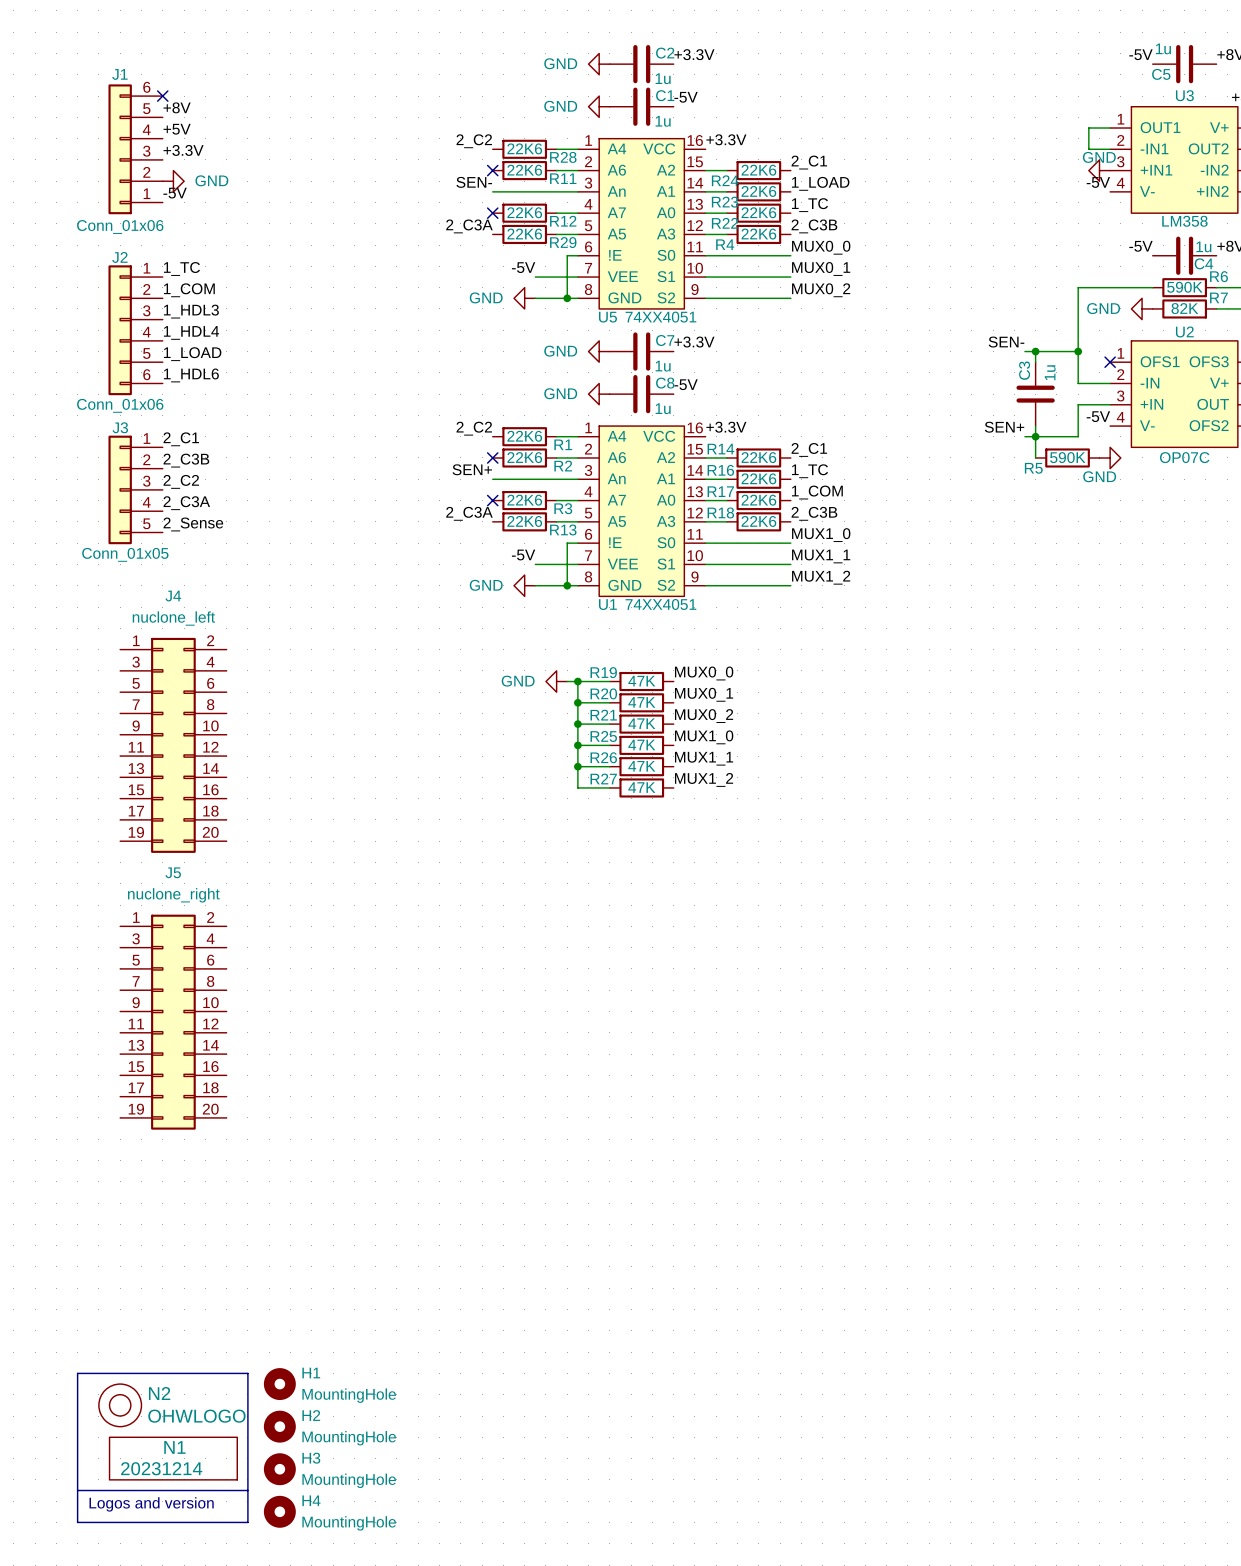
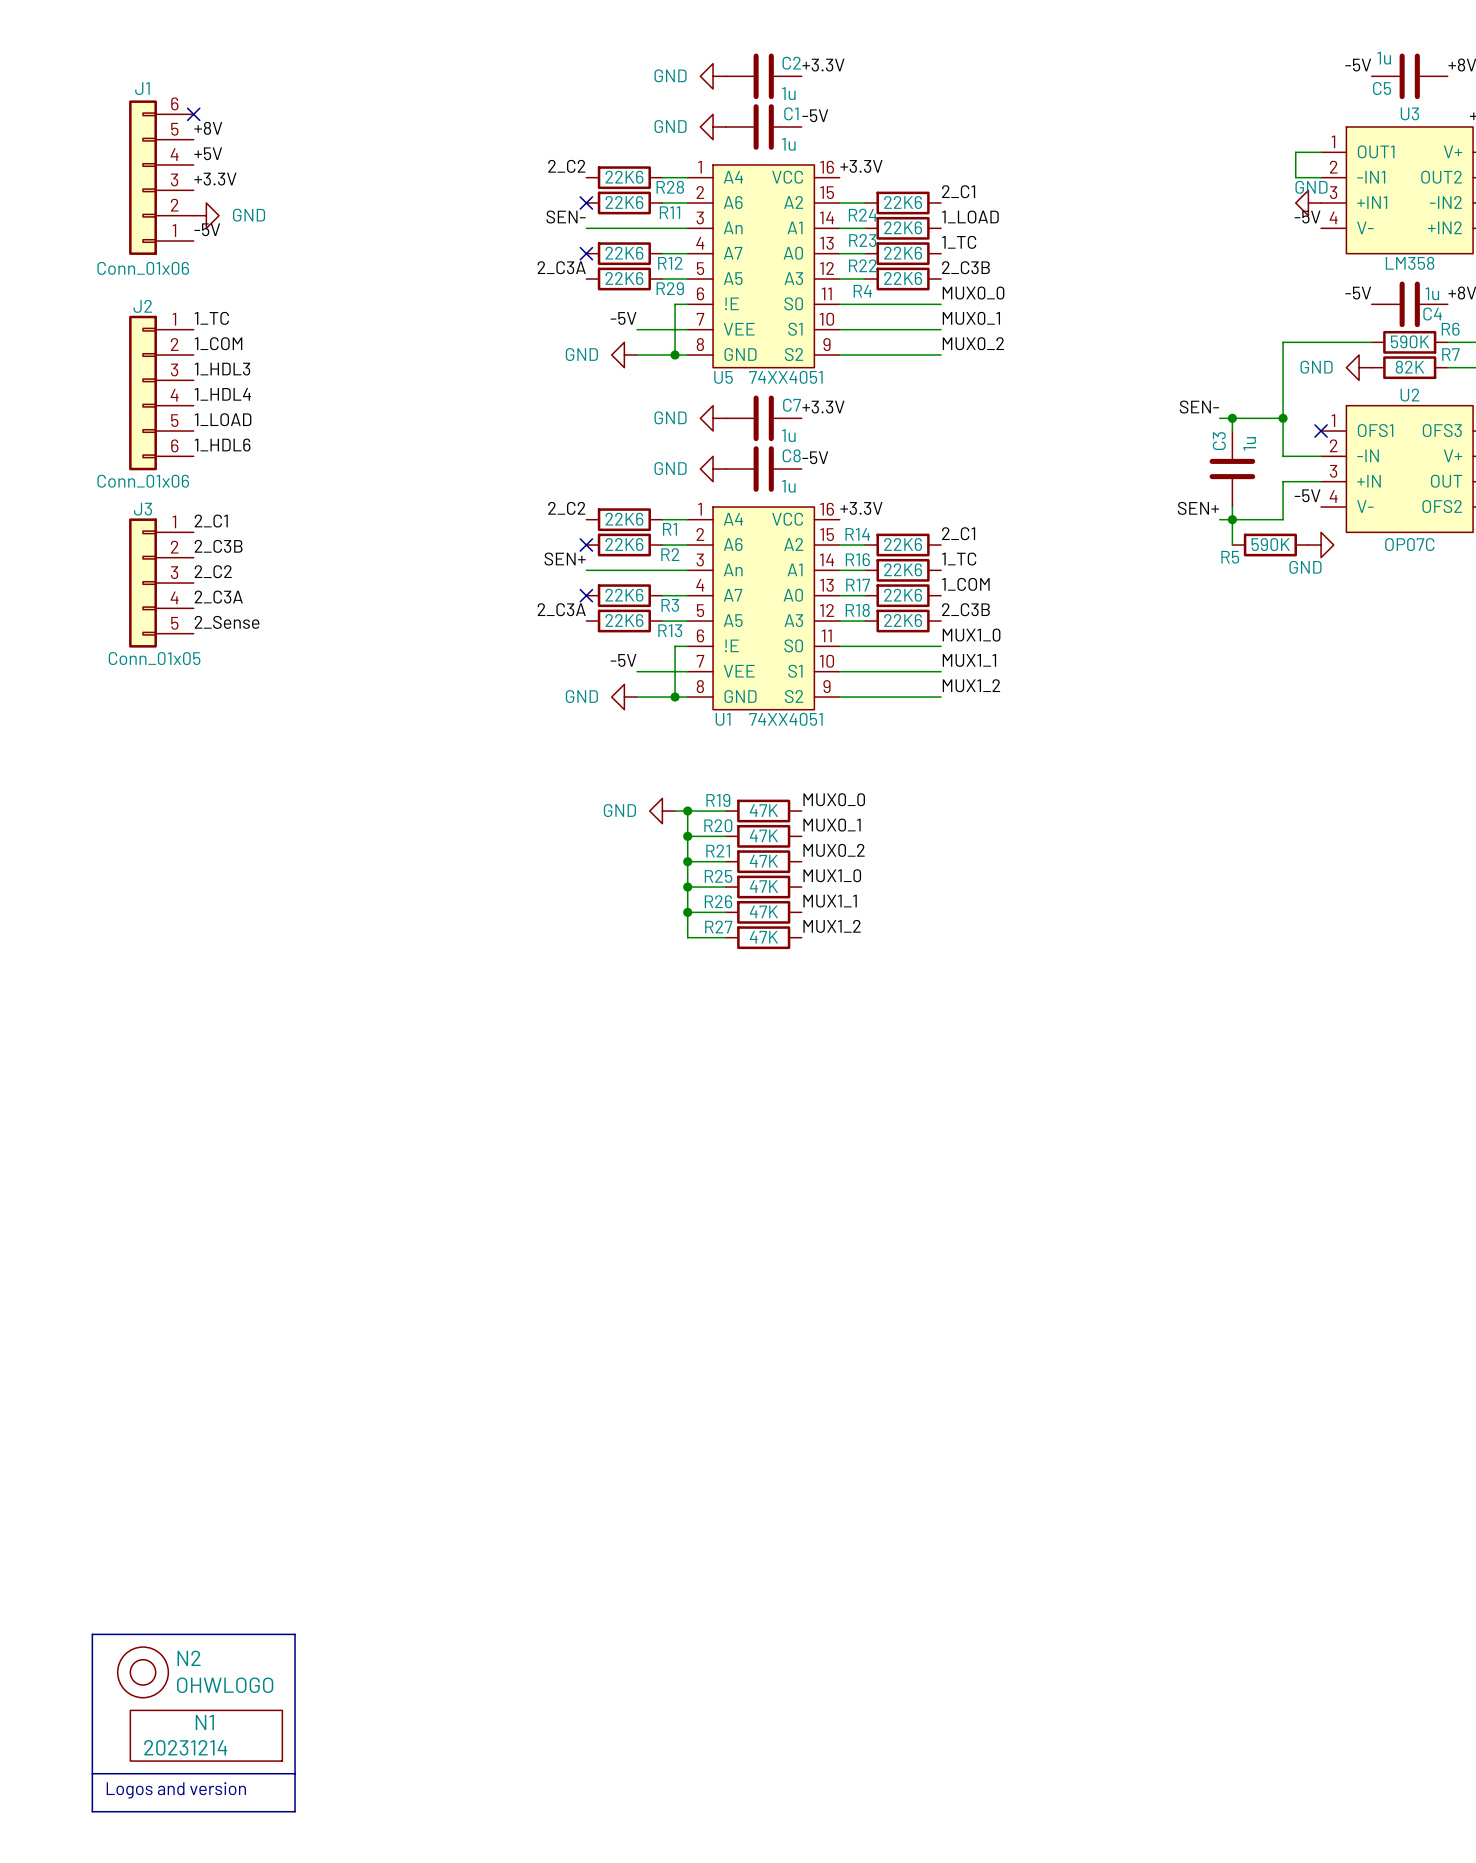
J4: nuclone_left (173, 745) -> none
J5: nuclone_right (173, 1022) -> none
H1: MountingHole (279, 1384) -> none
H2: MountingHole (279, 1426) -> none
H3: MountingHole (279, 1469) -> none
H4: MountingHole (279, 1511) -> none

